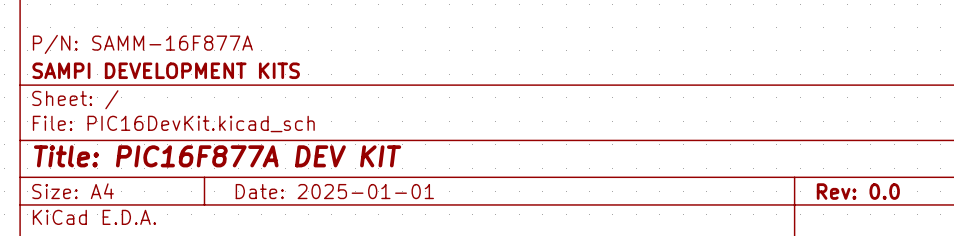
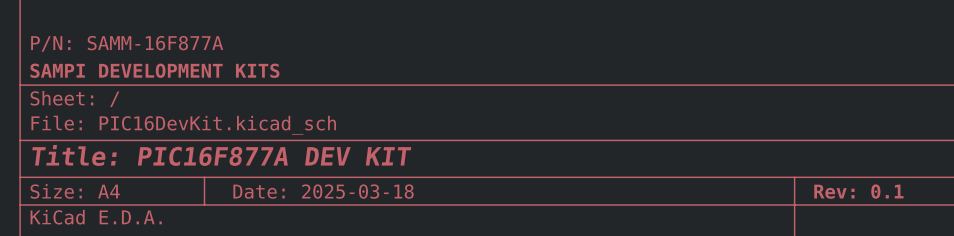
title block: Date: 2025-01-01 (334, 191) -> Date: 2025-03-18 (323, 191)
title block: Rev: 0.0 (858, 191) -> Rev: 0.1 (858, 191)

